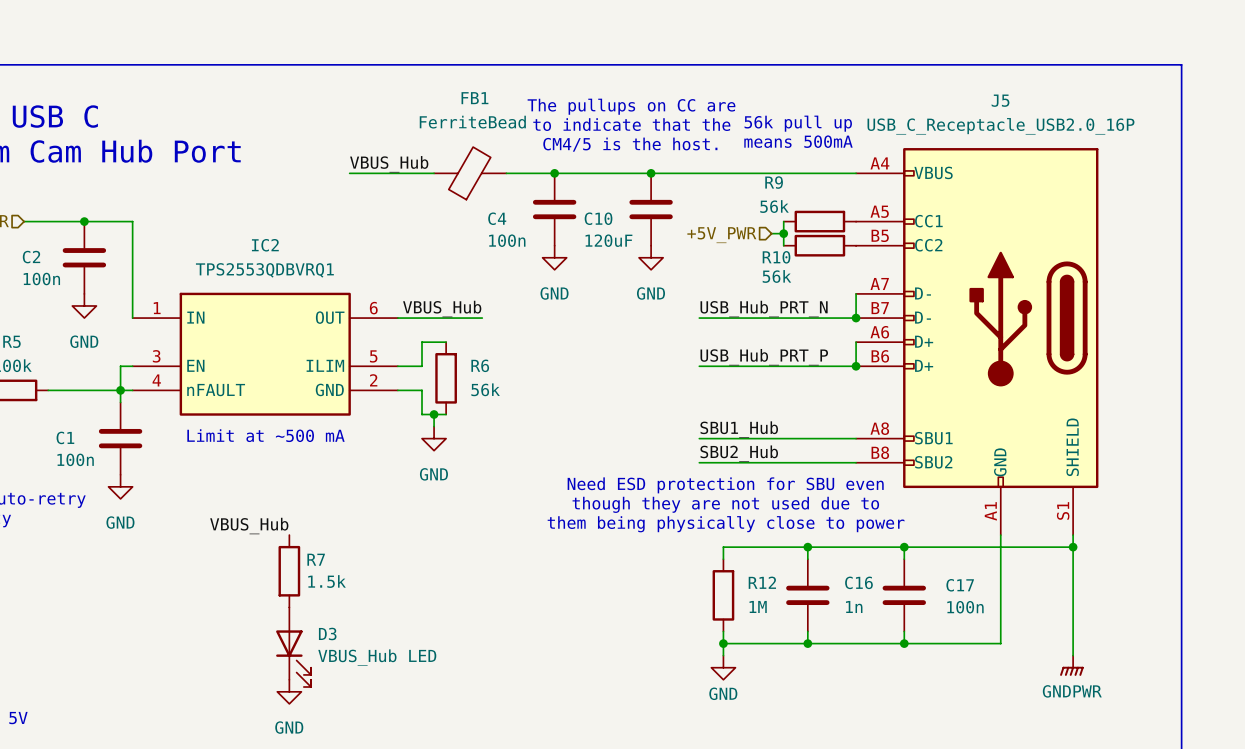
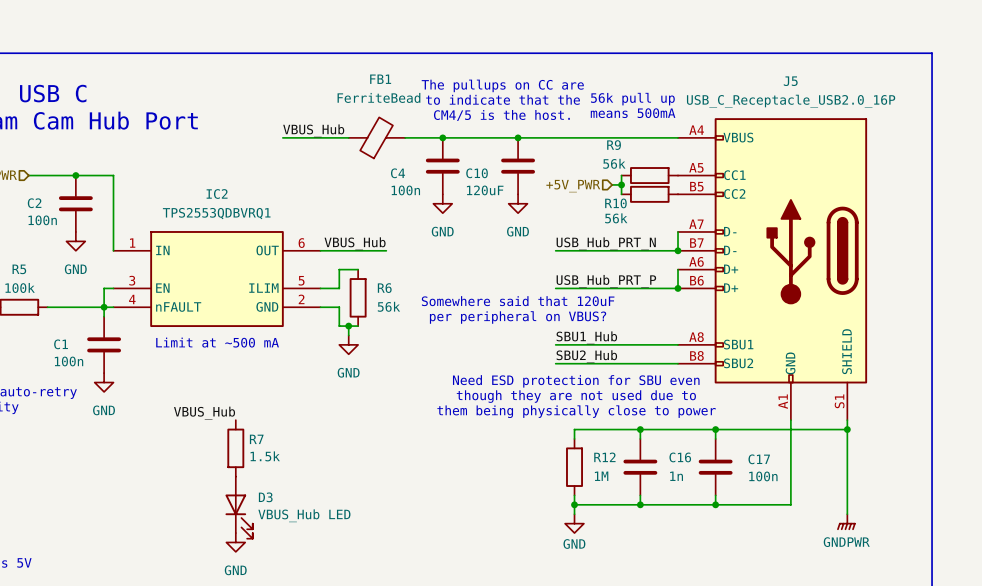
text: none -> Somewhere said that 120uF (518, 301)
text: none -> per peripheral on VBUS? (518, 317)

